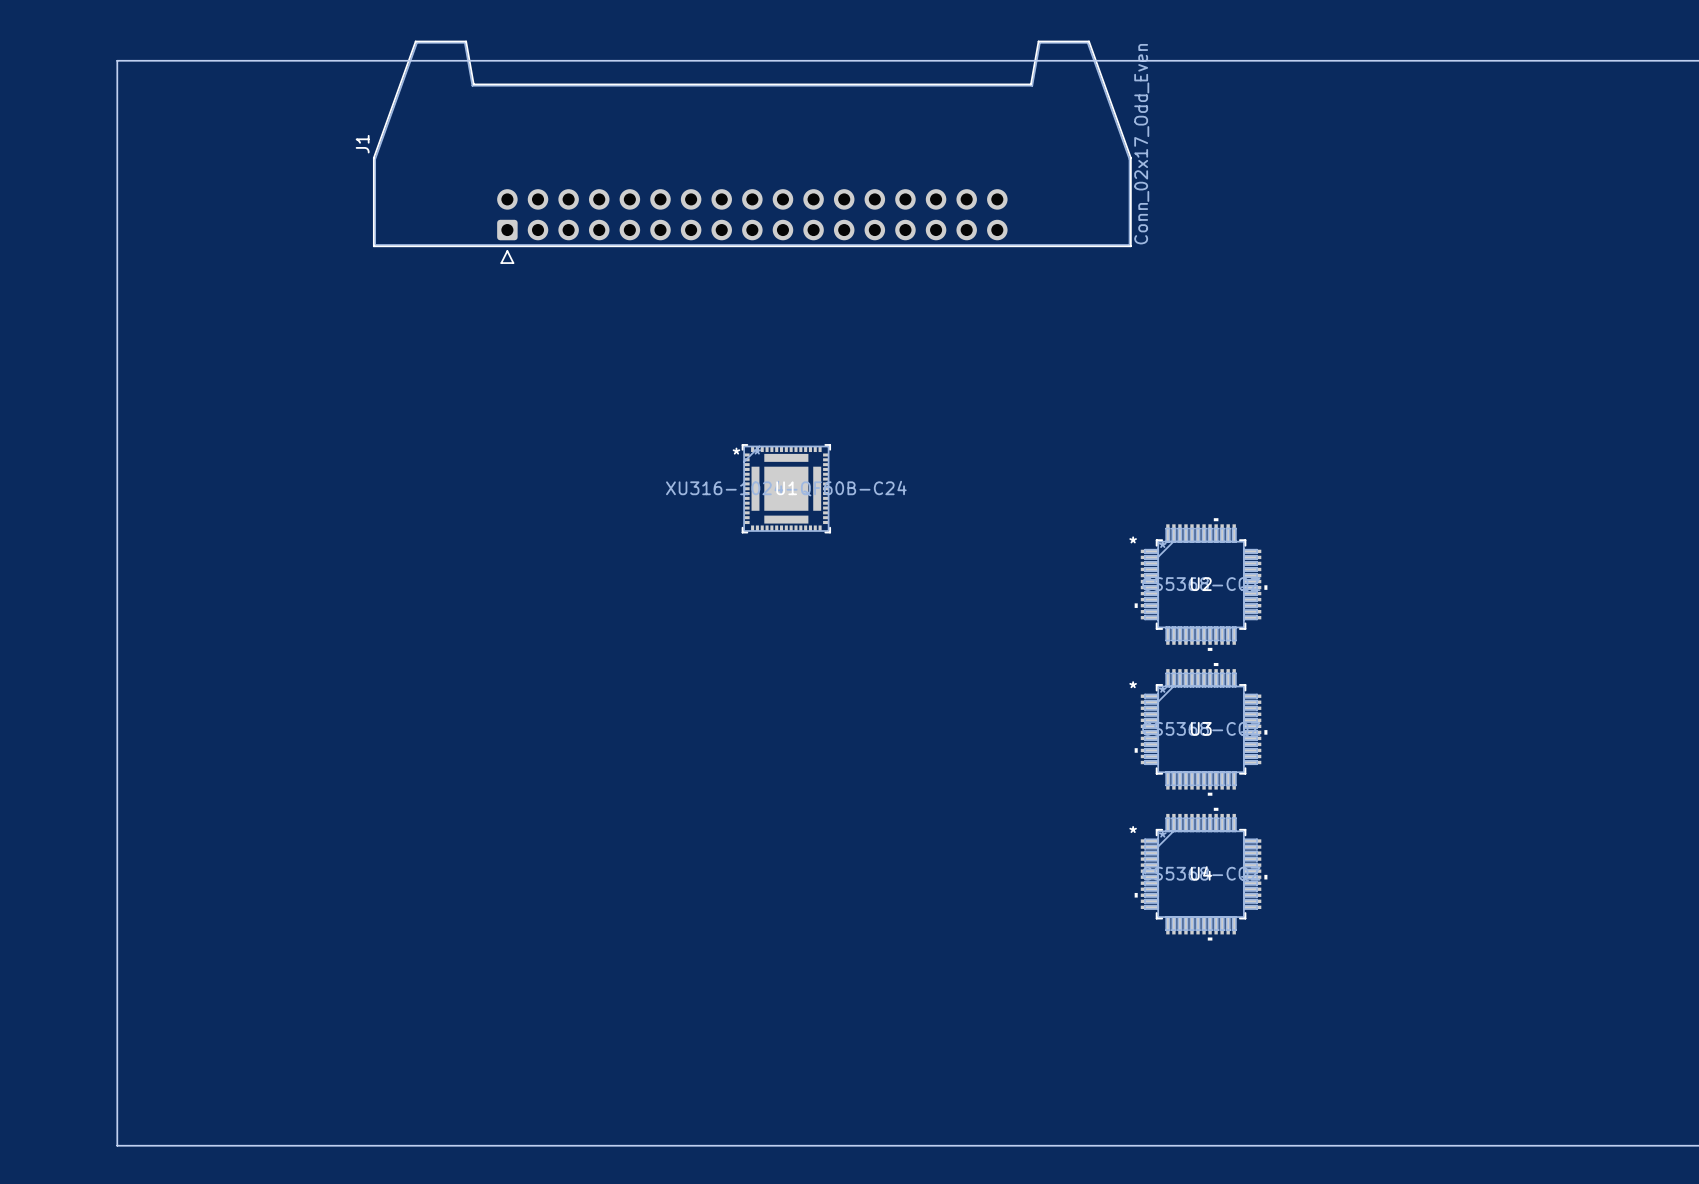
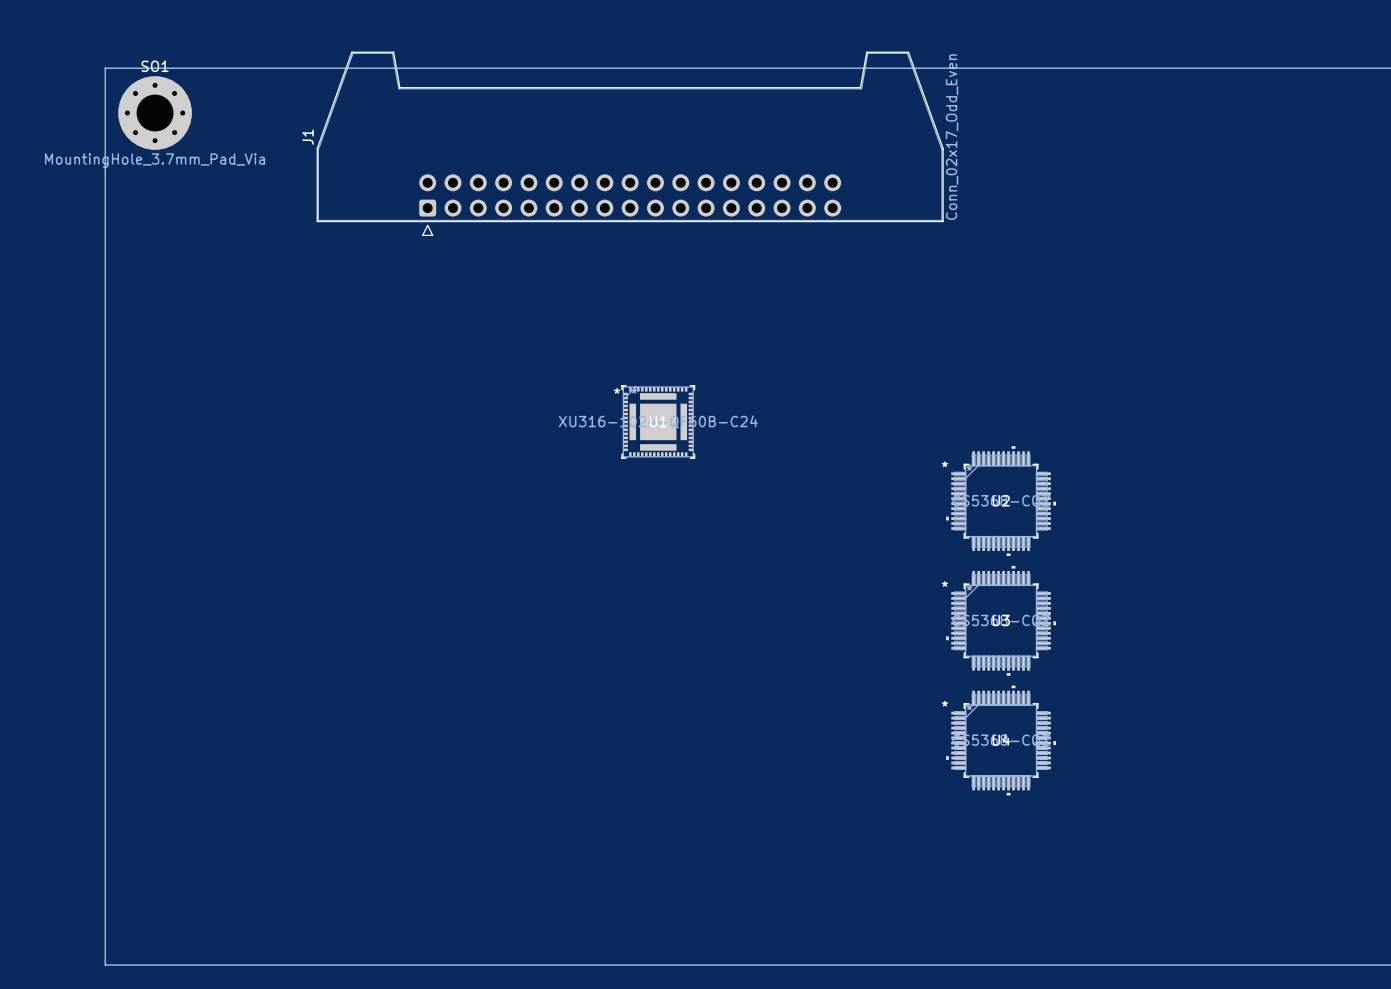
SO1: none -> MountingHole_3.7mm_Pad_Via (155, 113)

